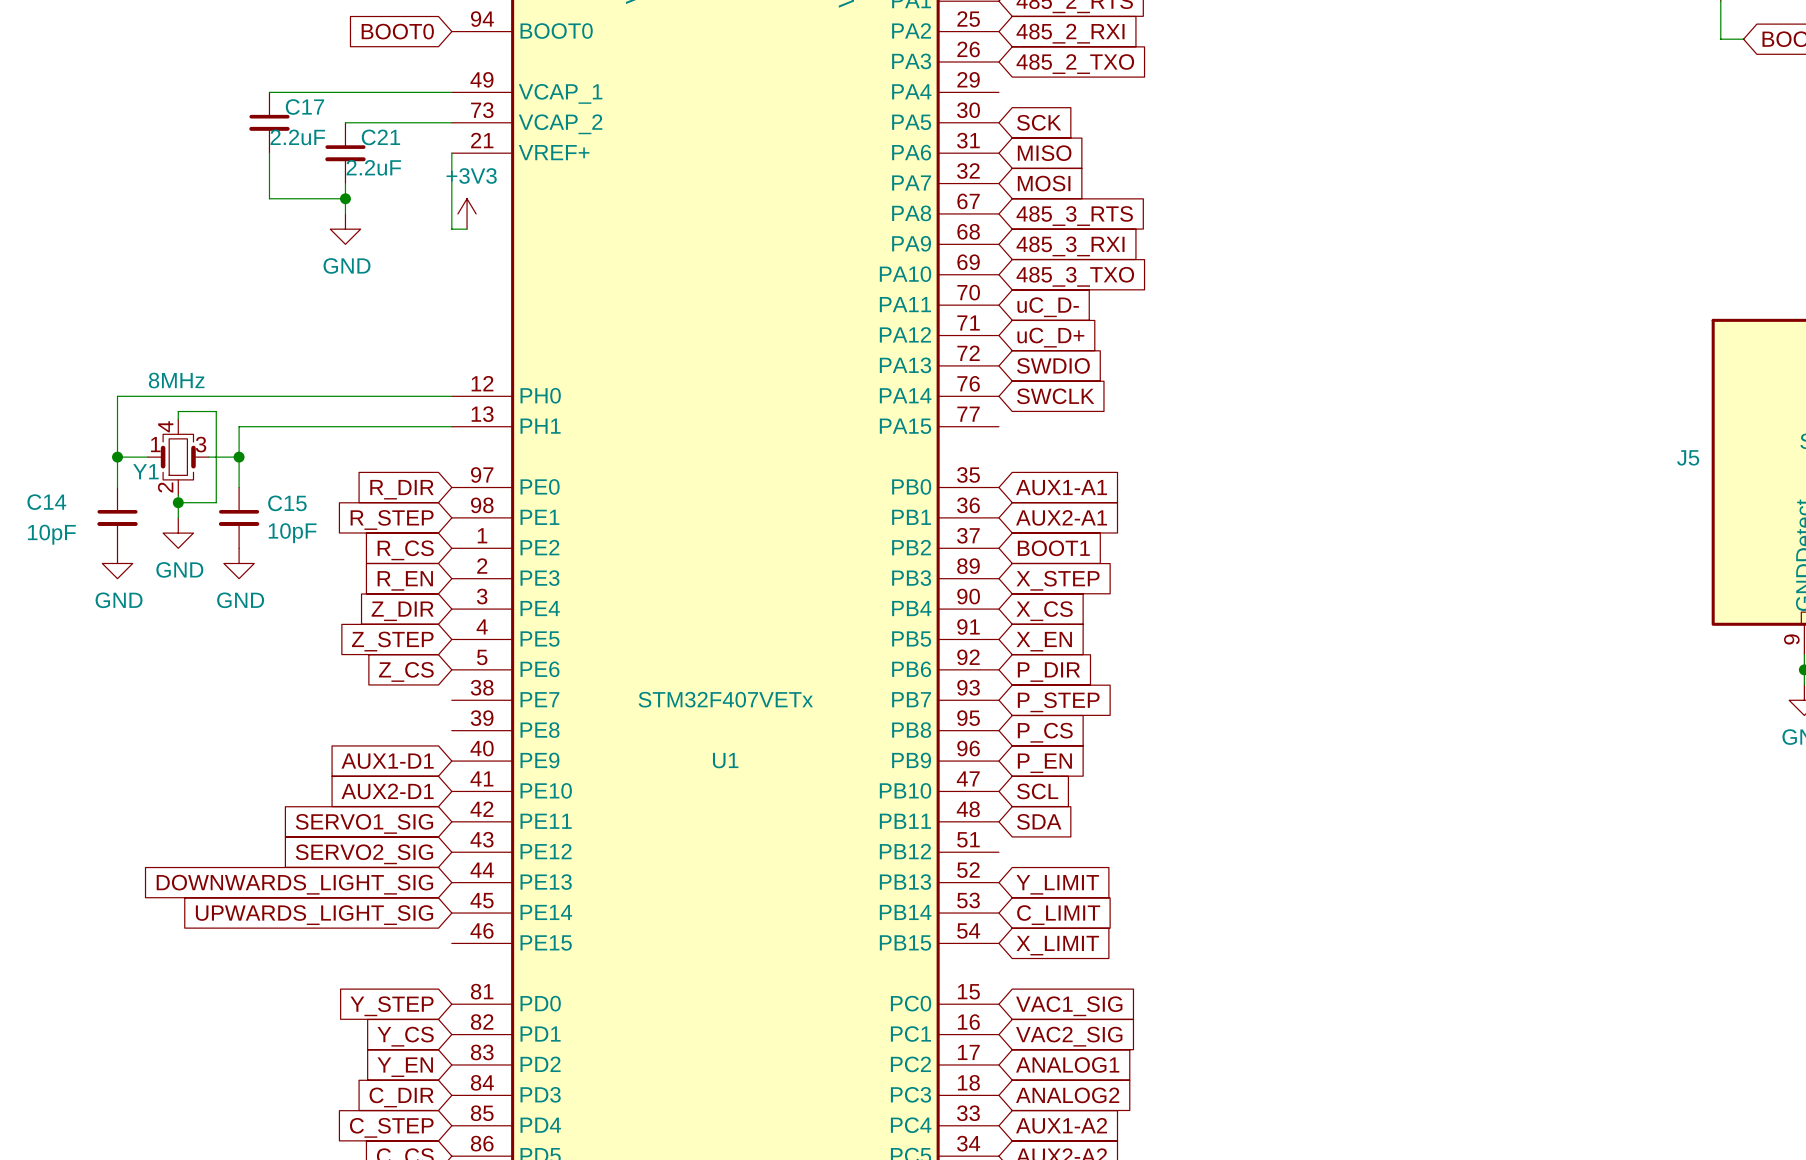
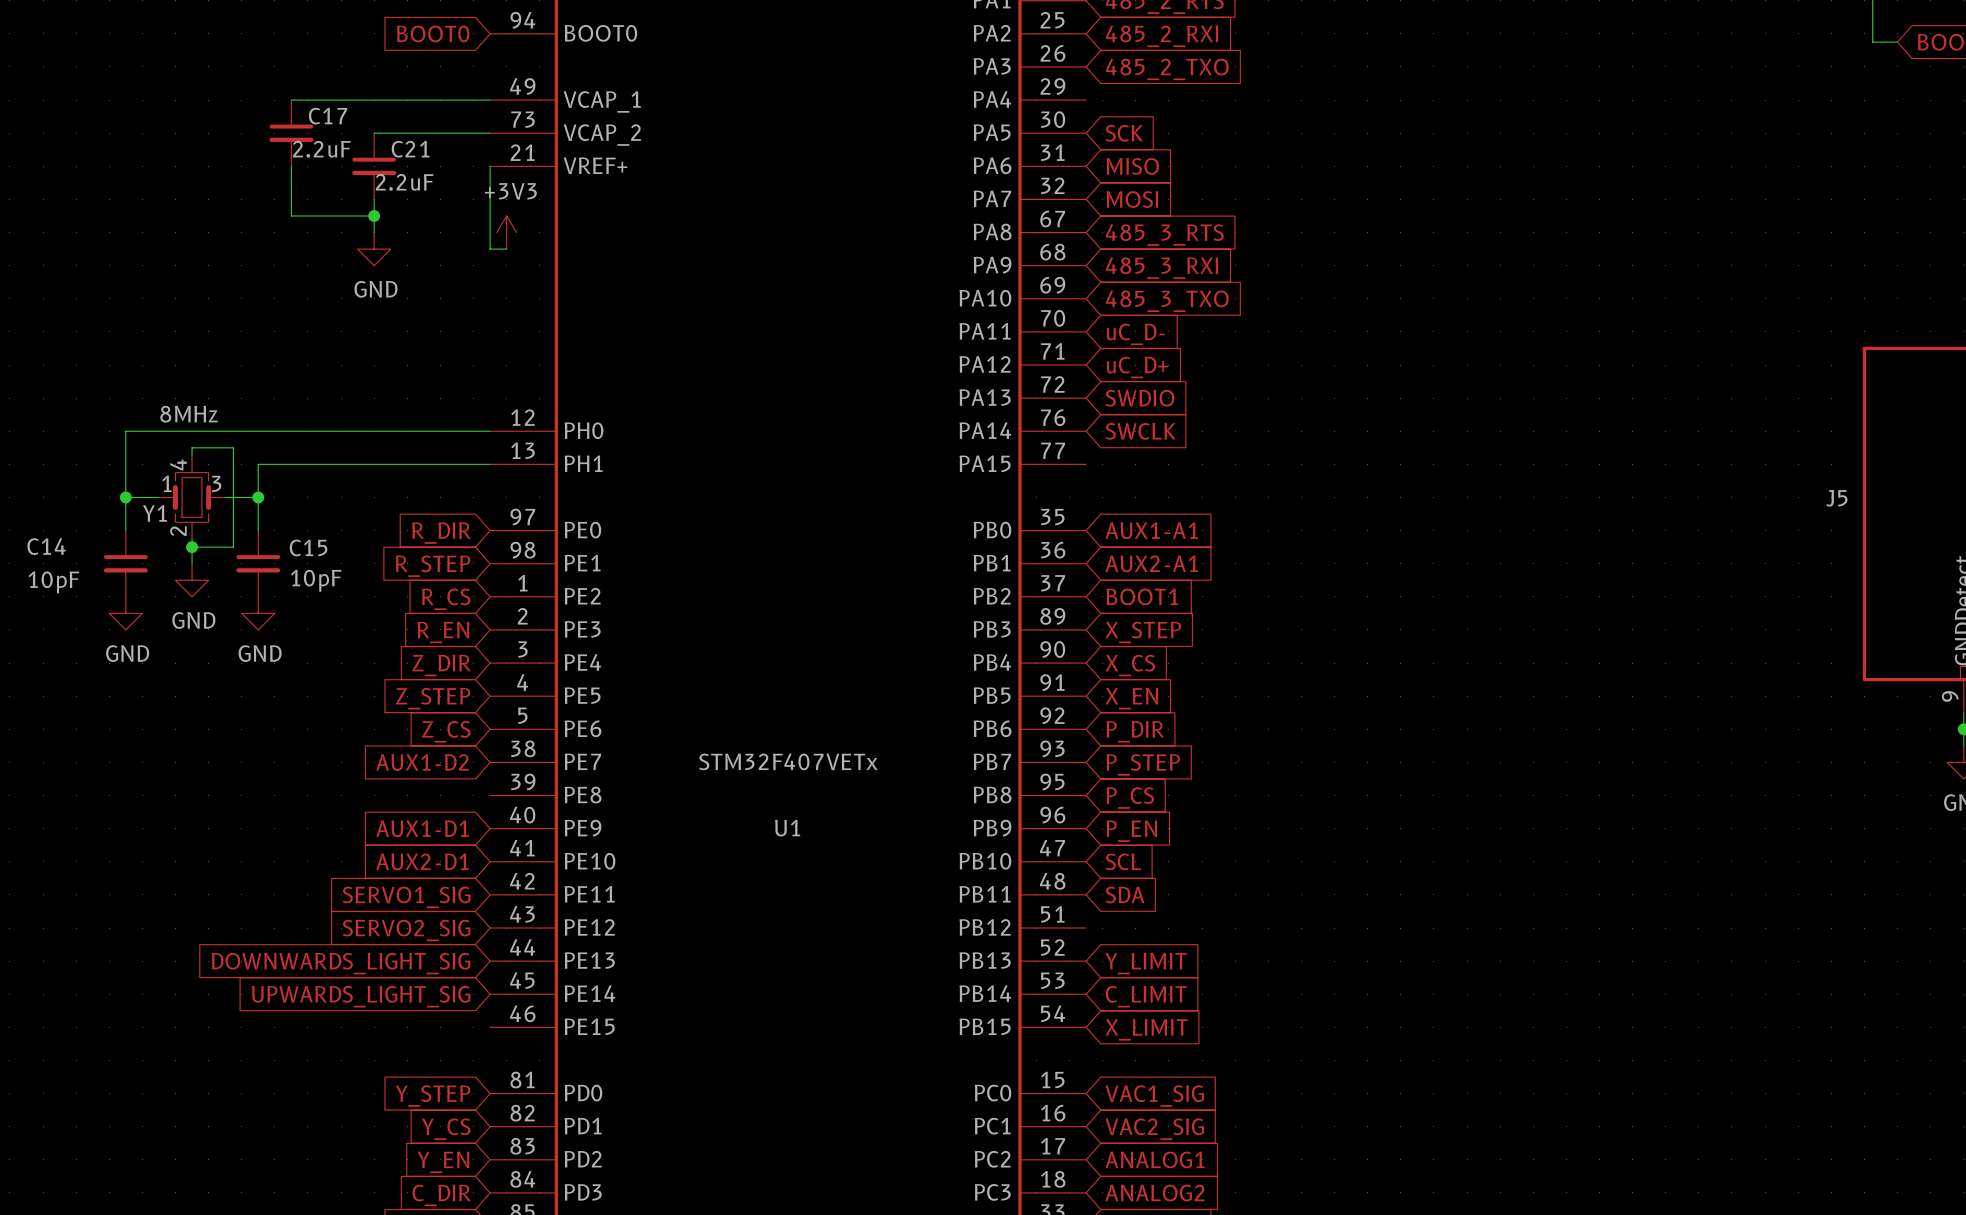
global label: none -> AUX1-D2 (422, 762)

